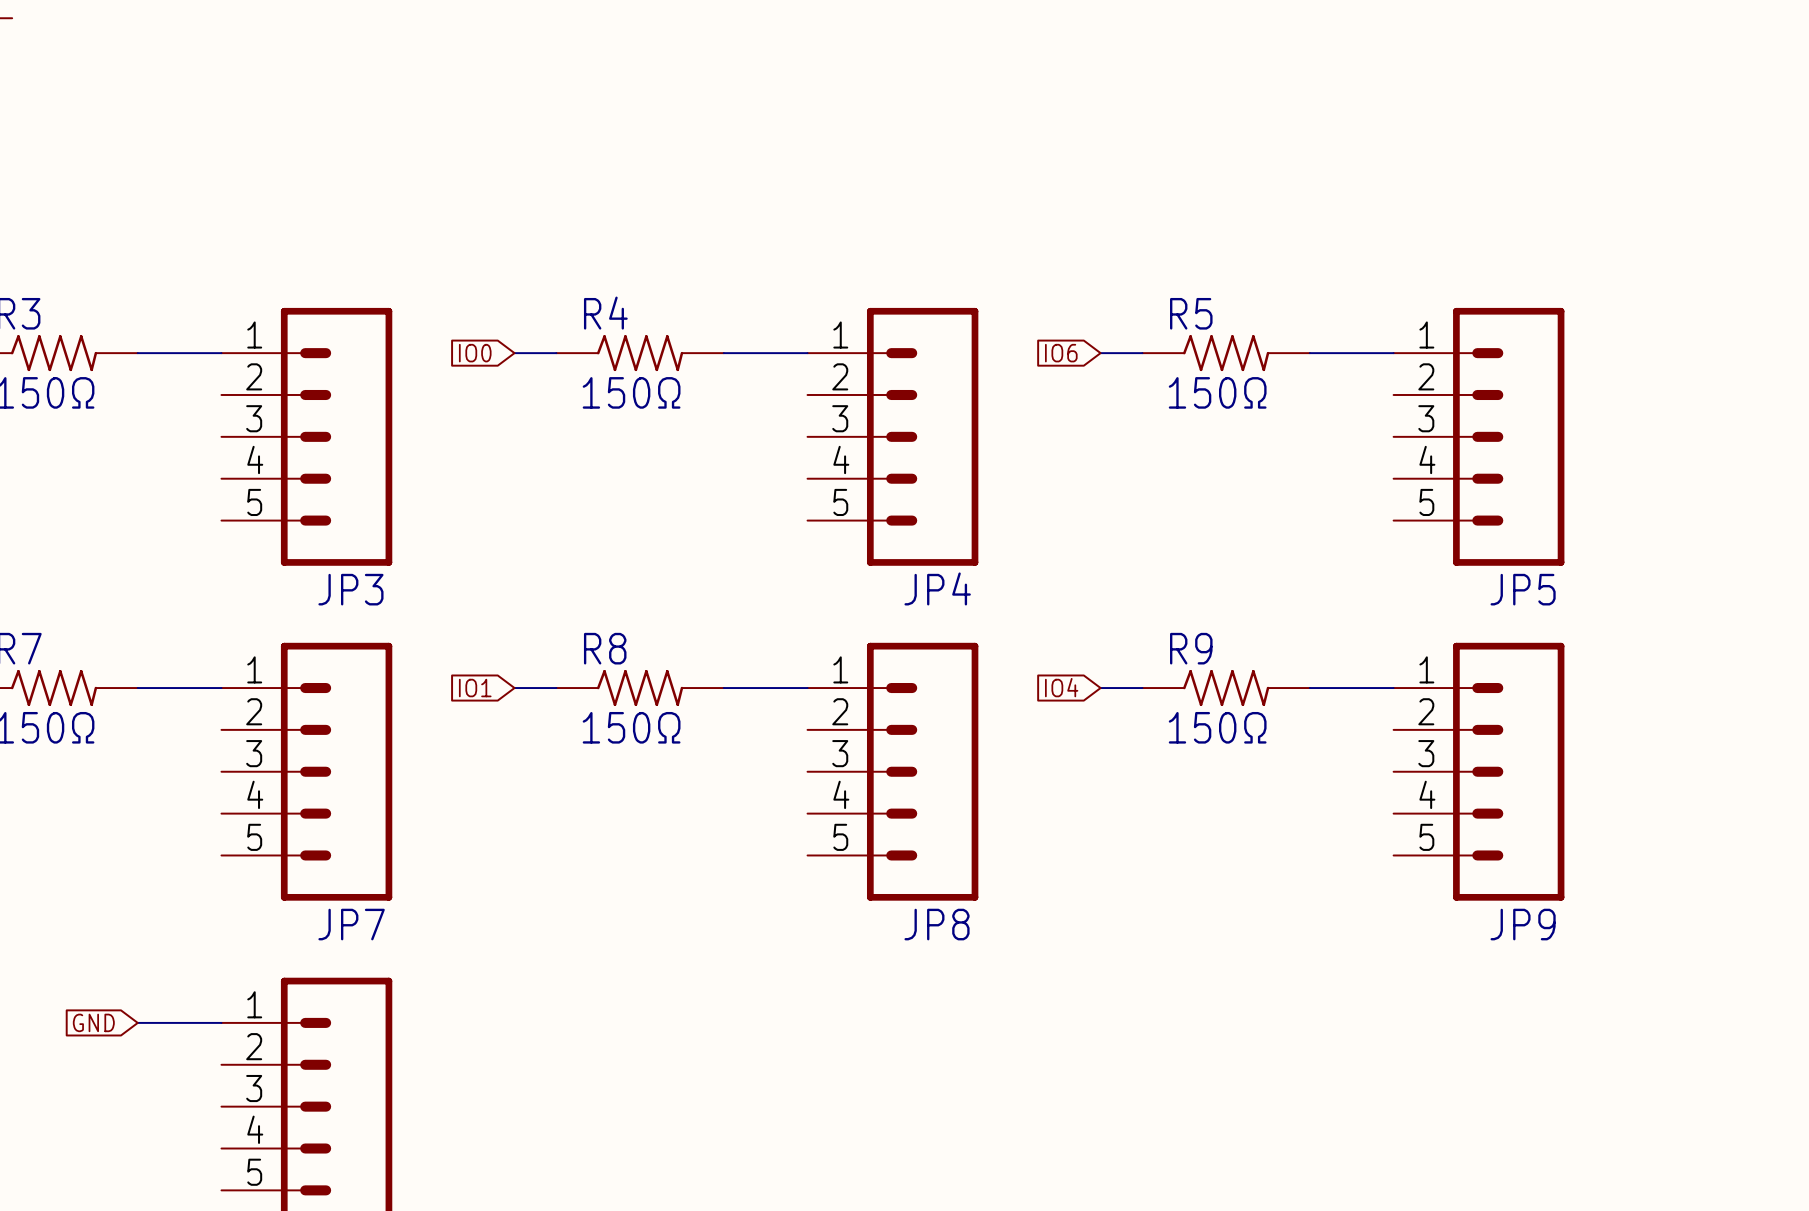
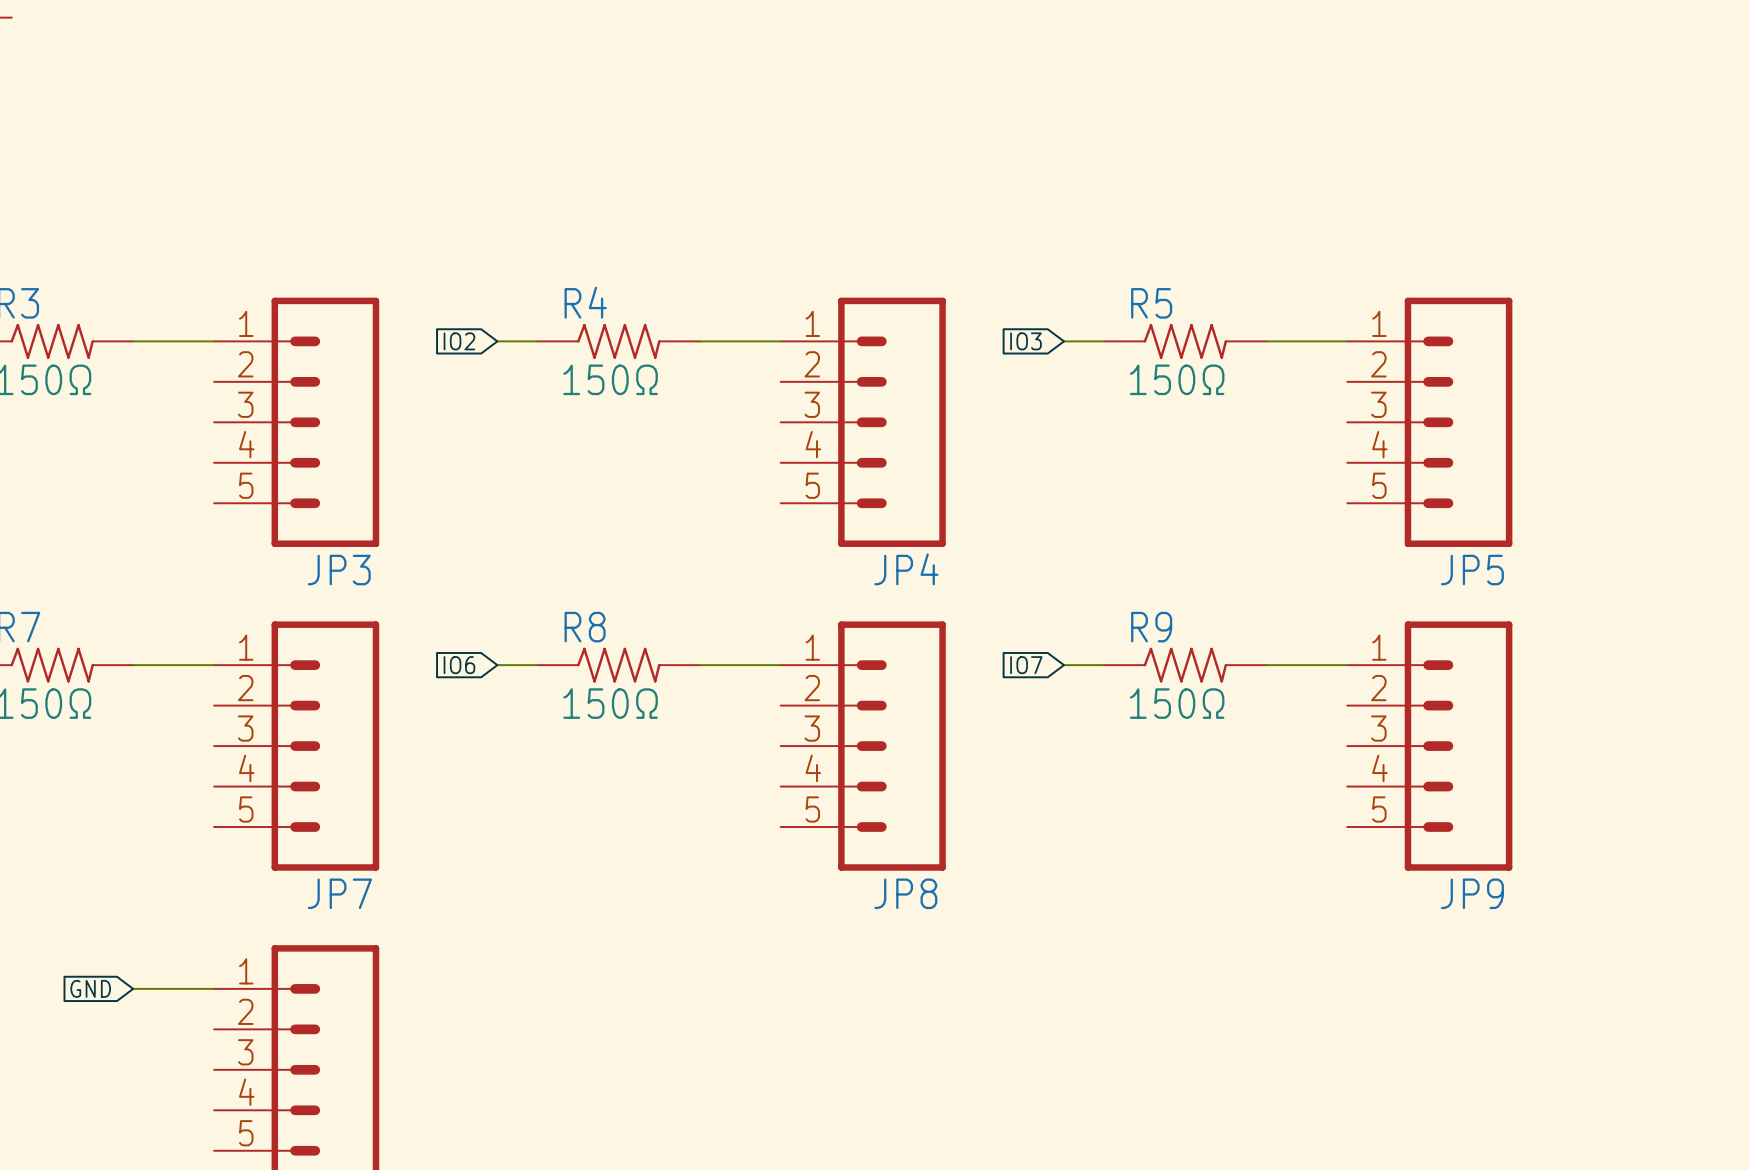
global label: IO0 (475, 353) -> IO2 (459, 341)
global label: IO6 (1061, 353) -> IO3 (1025, 341)
global label: IO4 (1061, 687) -> IO7 (1026, 665)
global label: IO1 (475, 688) -> IO6 (459, 665)

